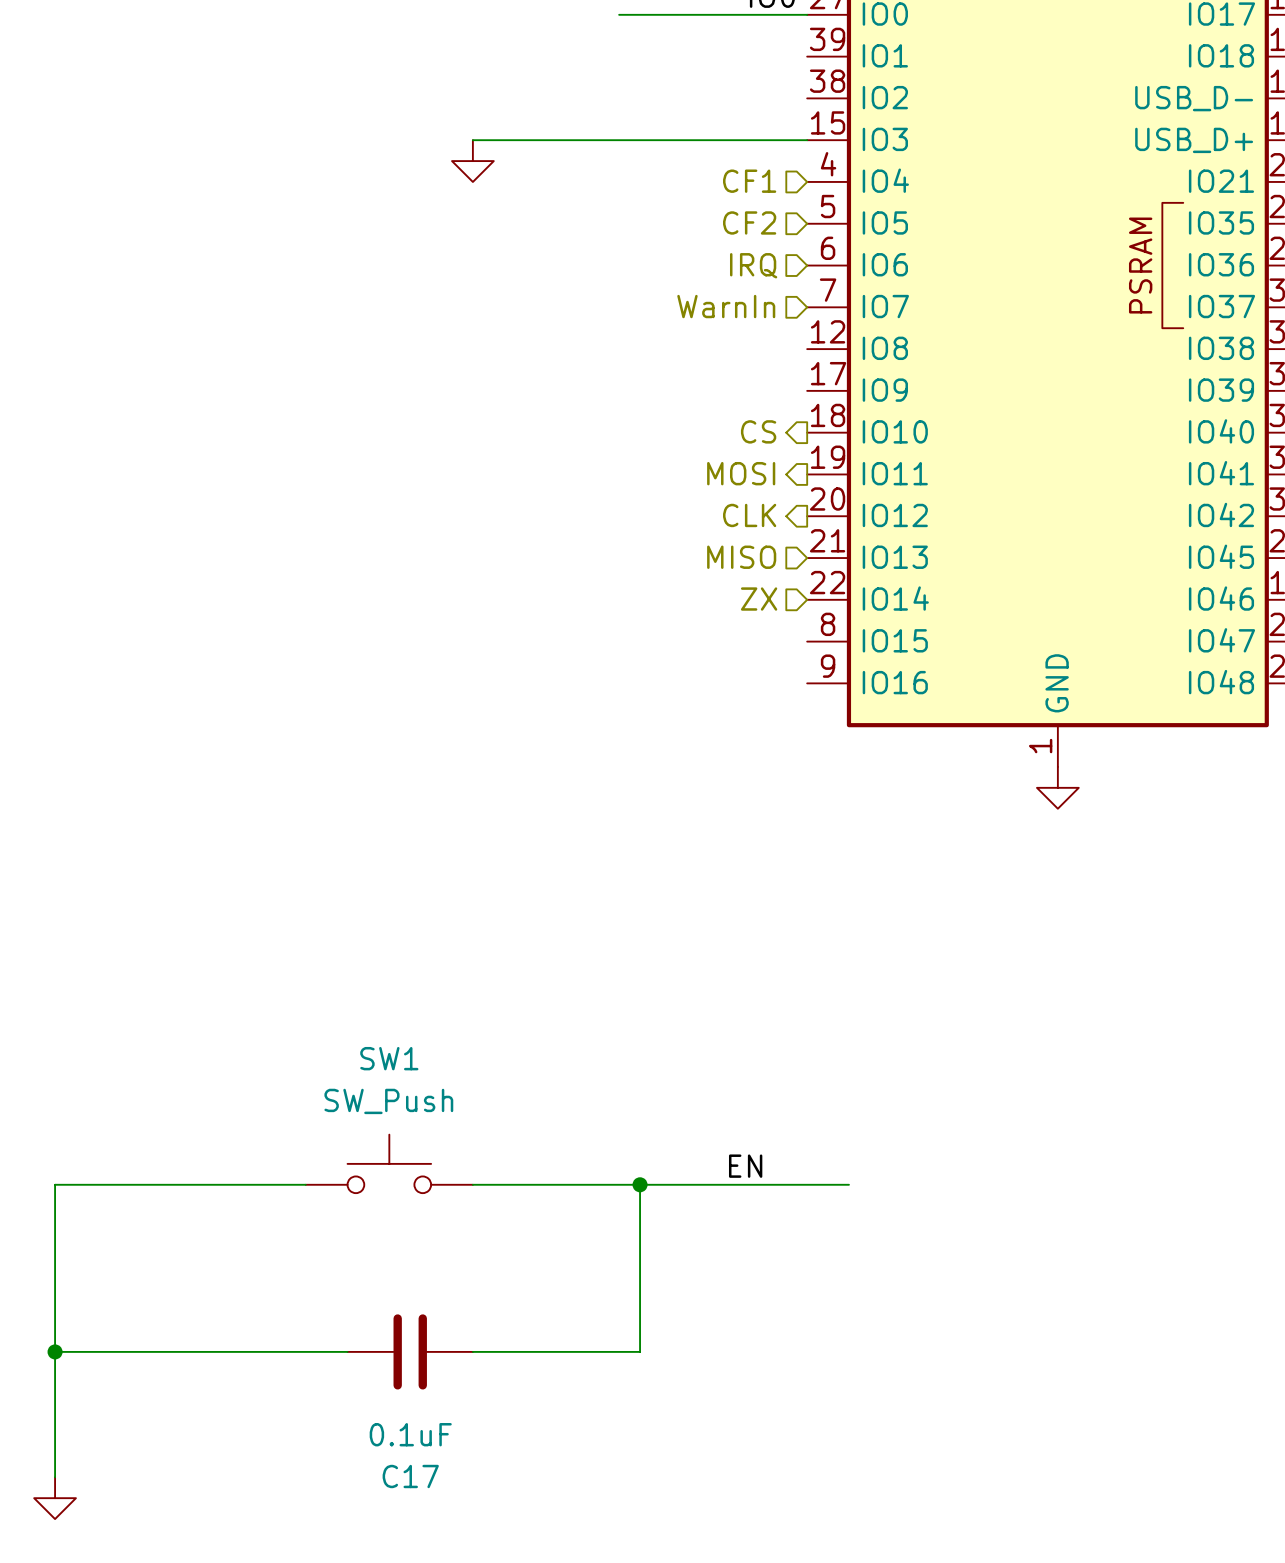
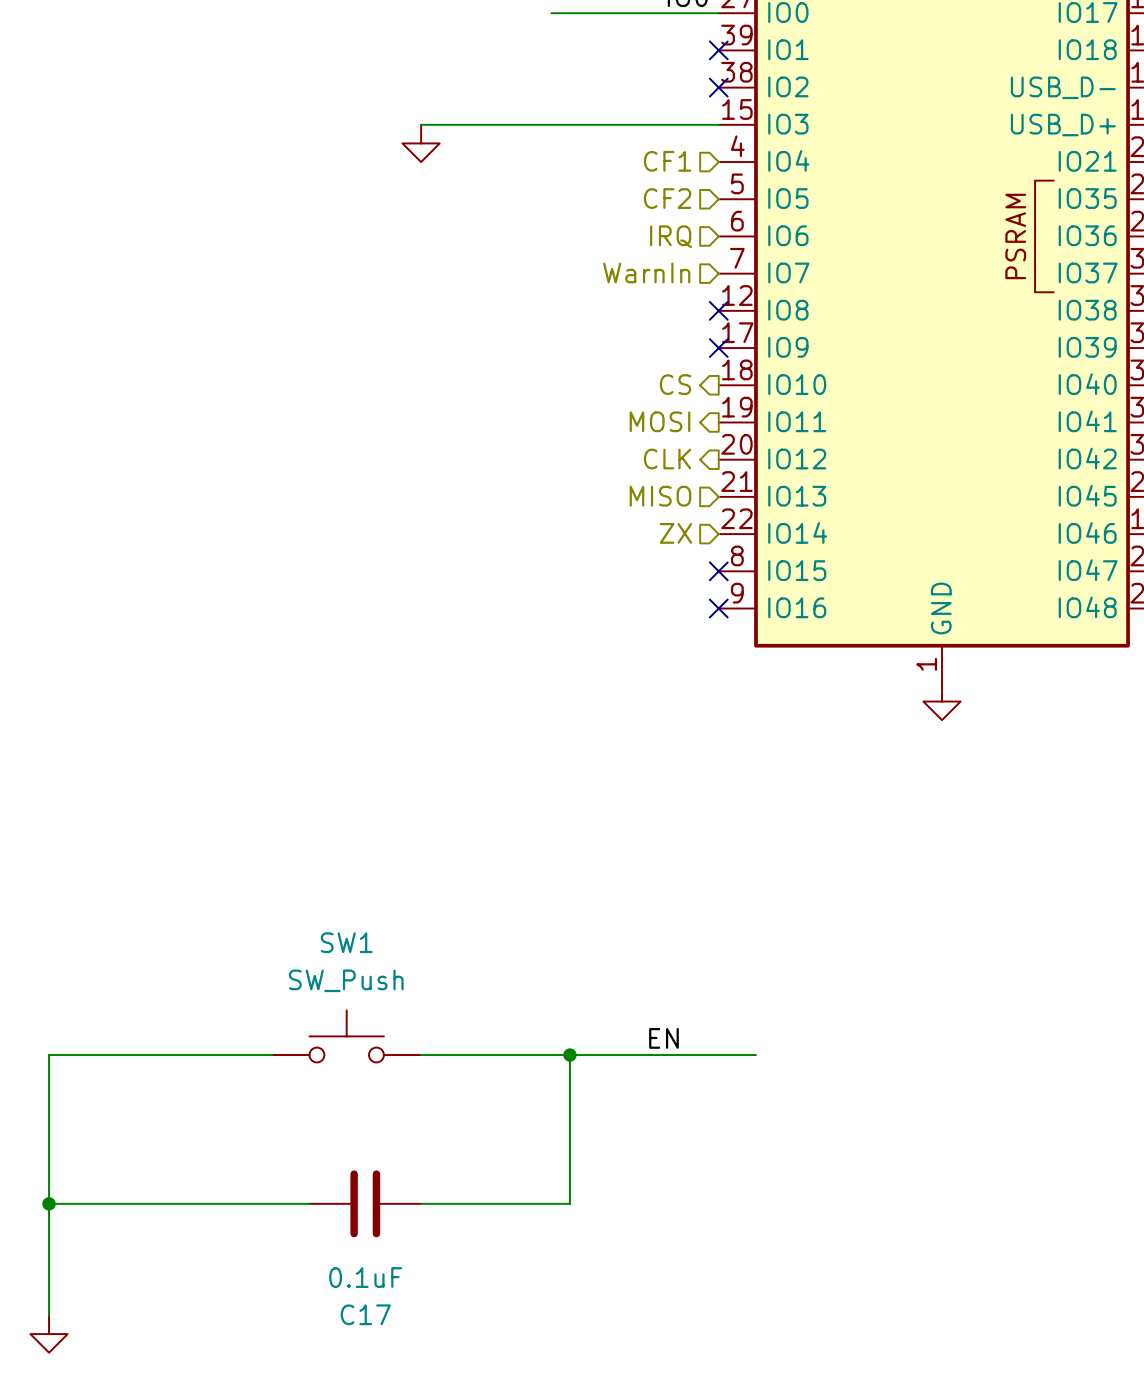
no-connect mark: none -> (718, 50)
no-connect mark: none -> (718, 87)
no-connect mark: none -> (718, 310)
no-connect mark: none -> (718, 348)
no-connect mark: none -> (718, 571)
no-connect mark: none -> (718, 608)

